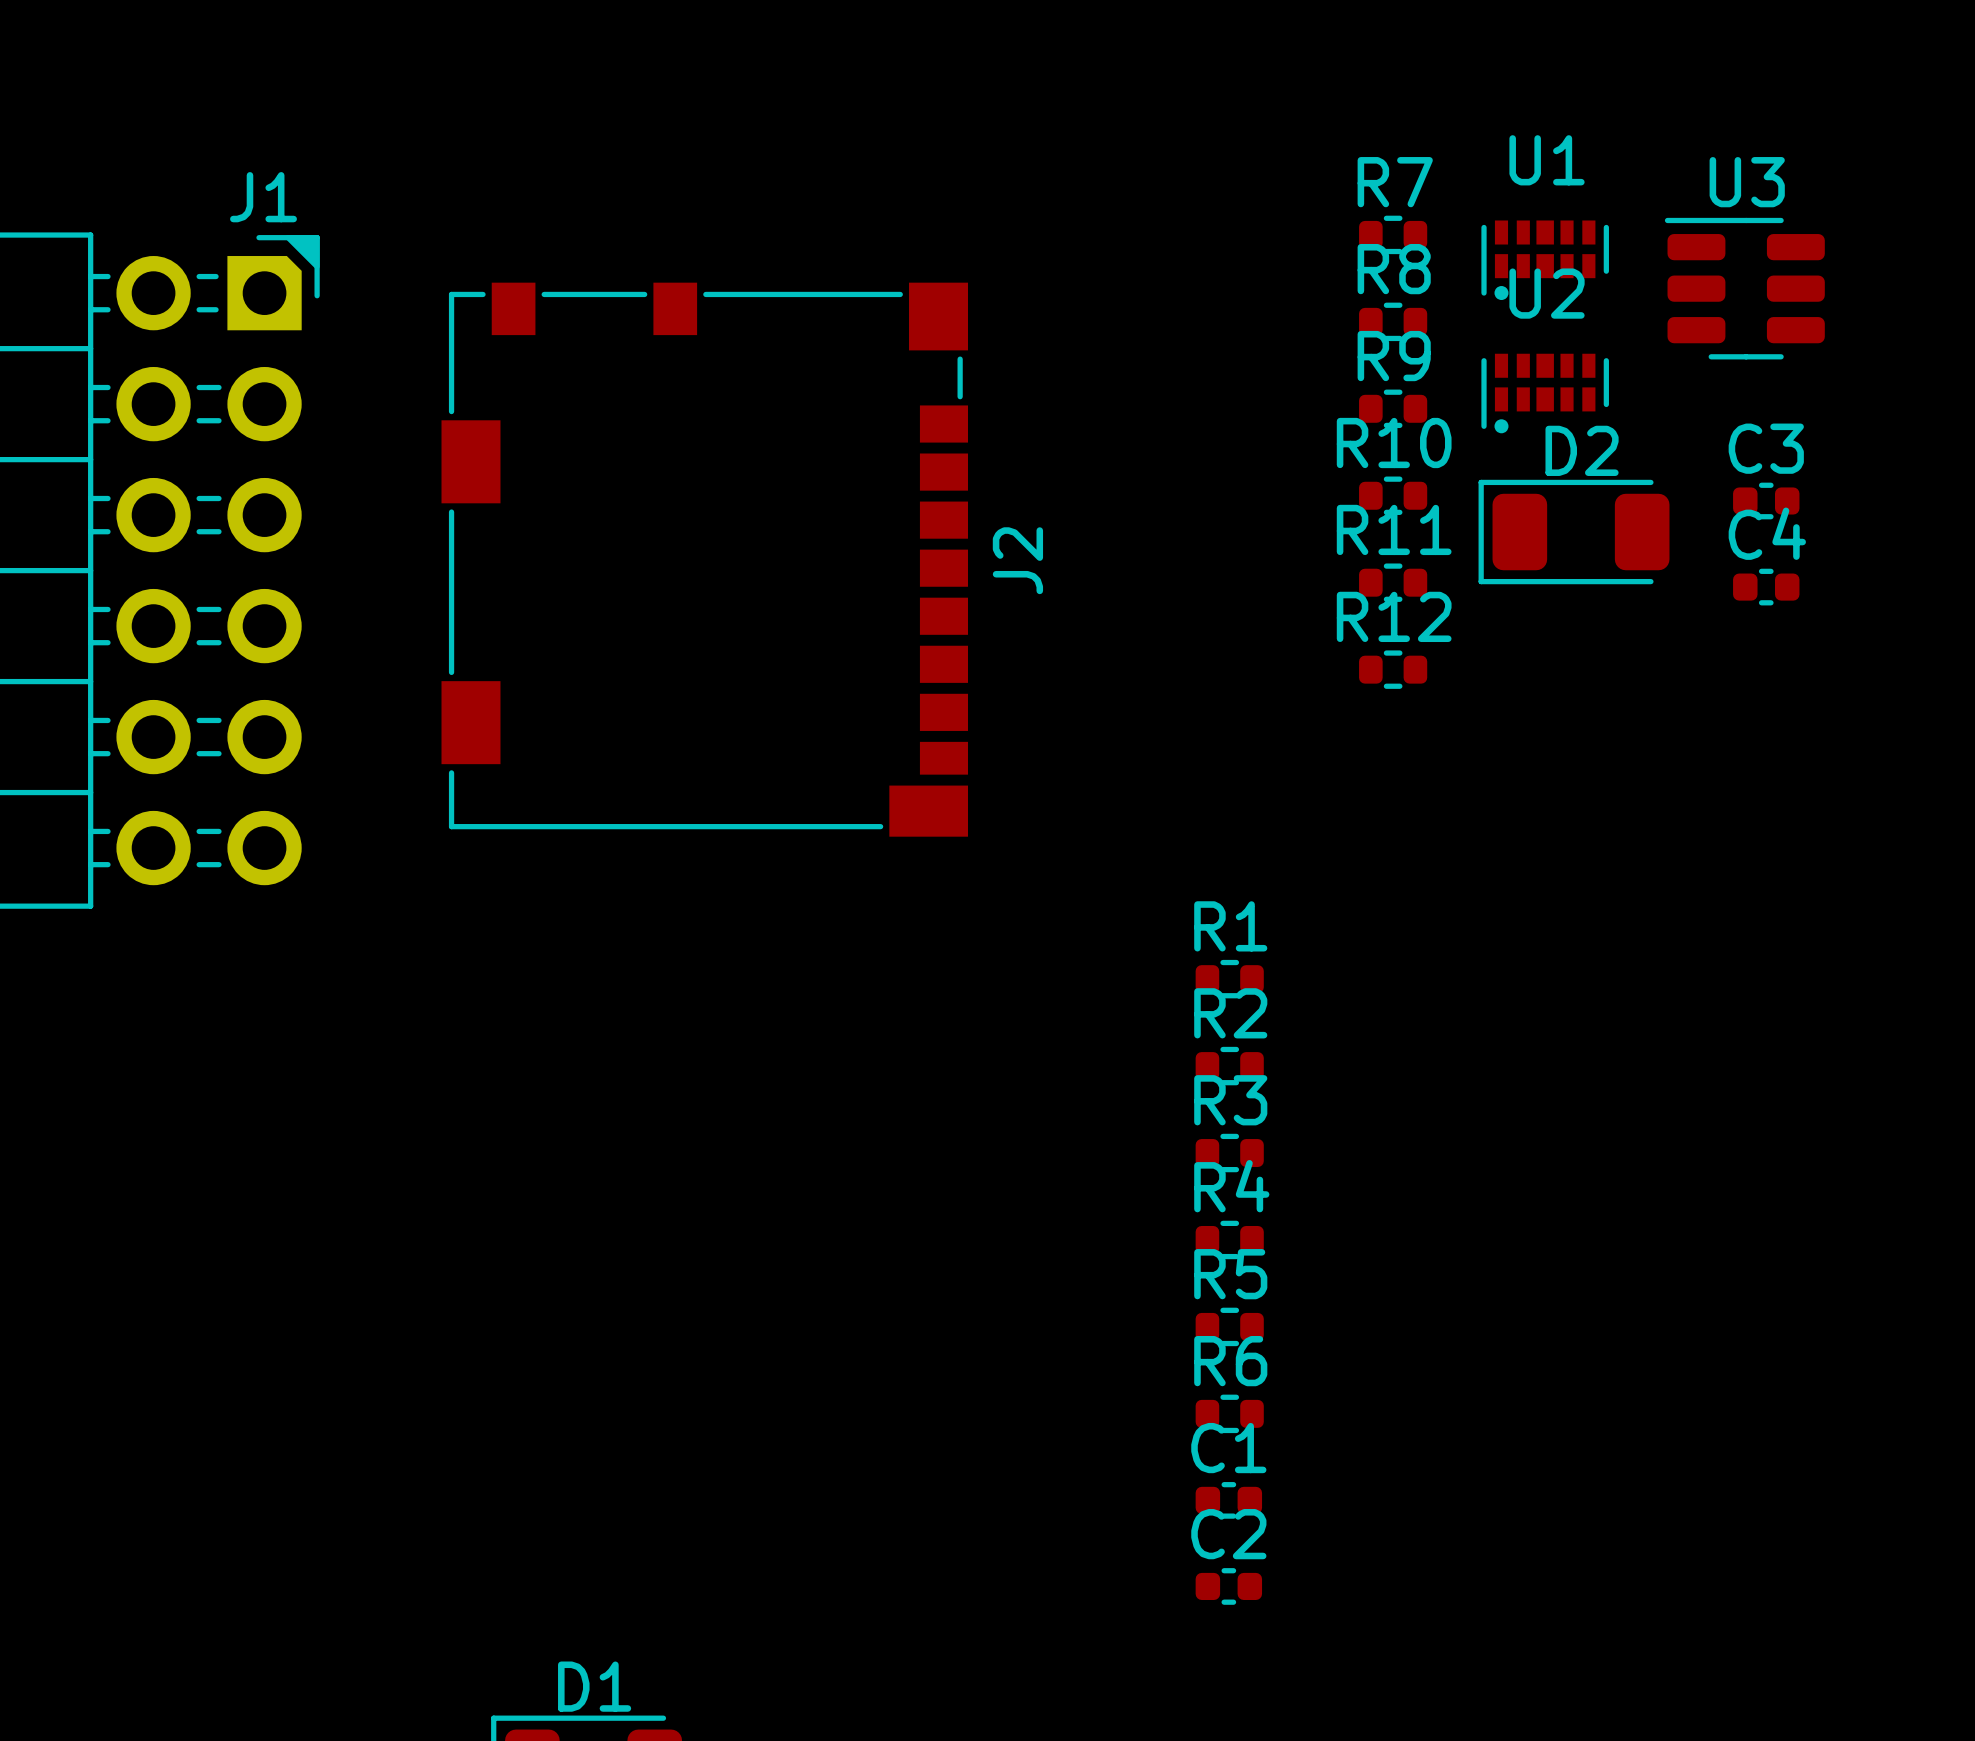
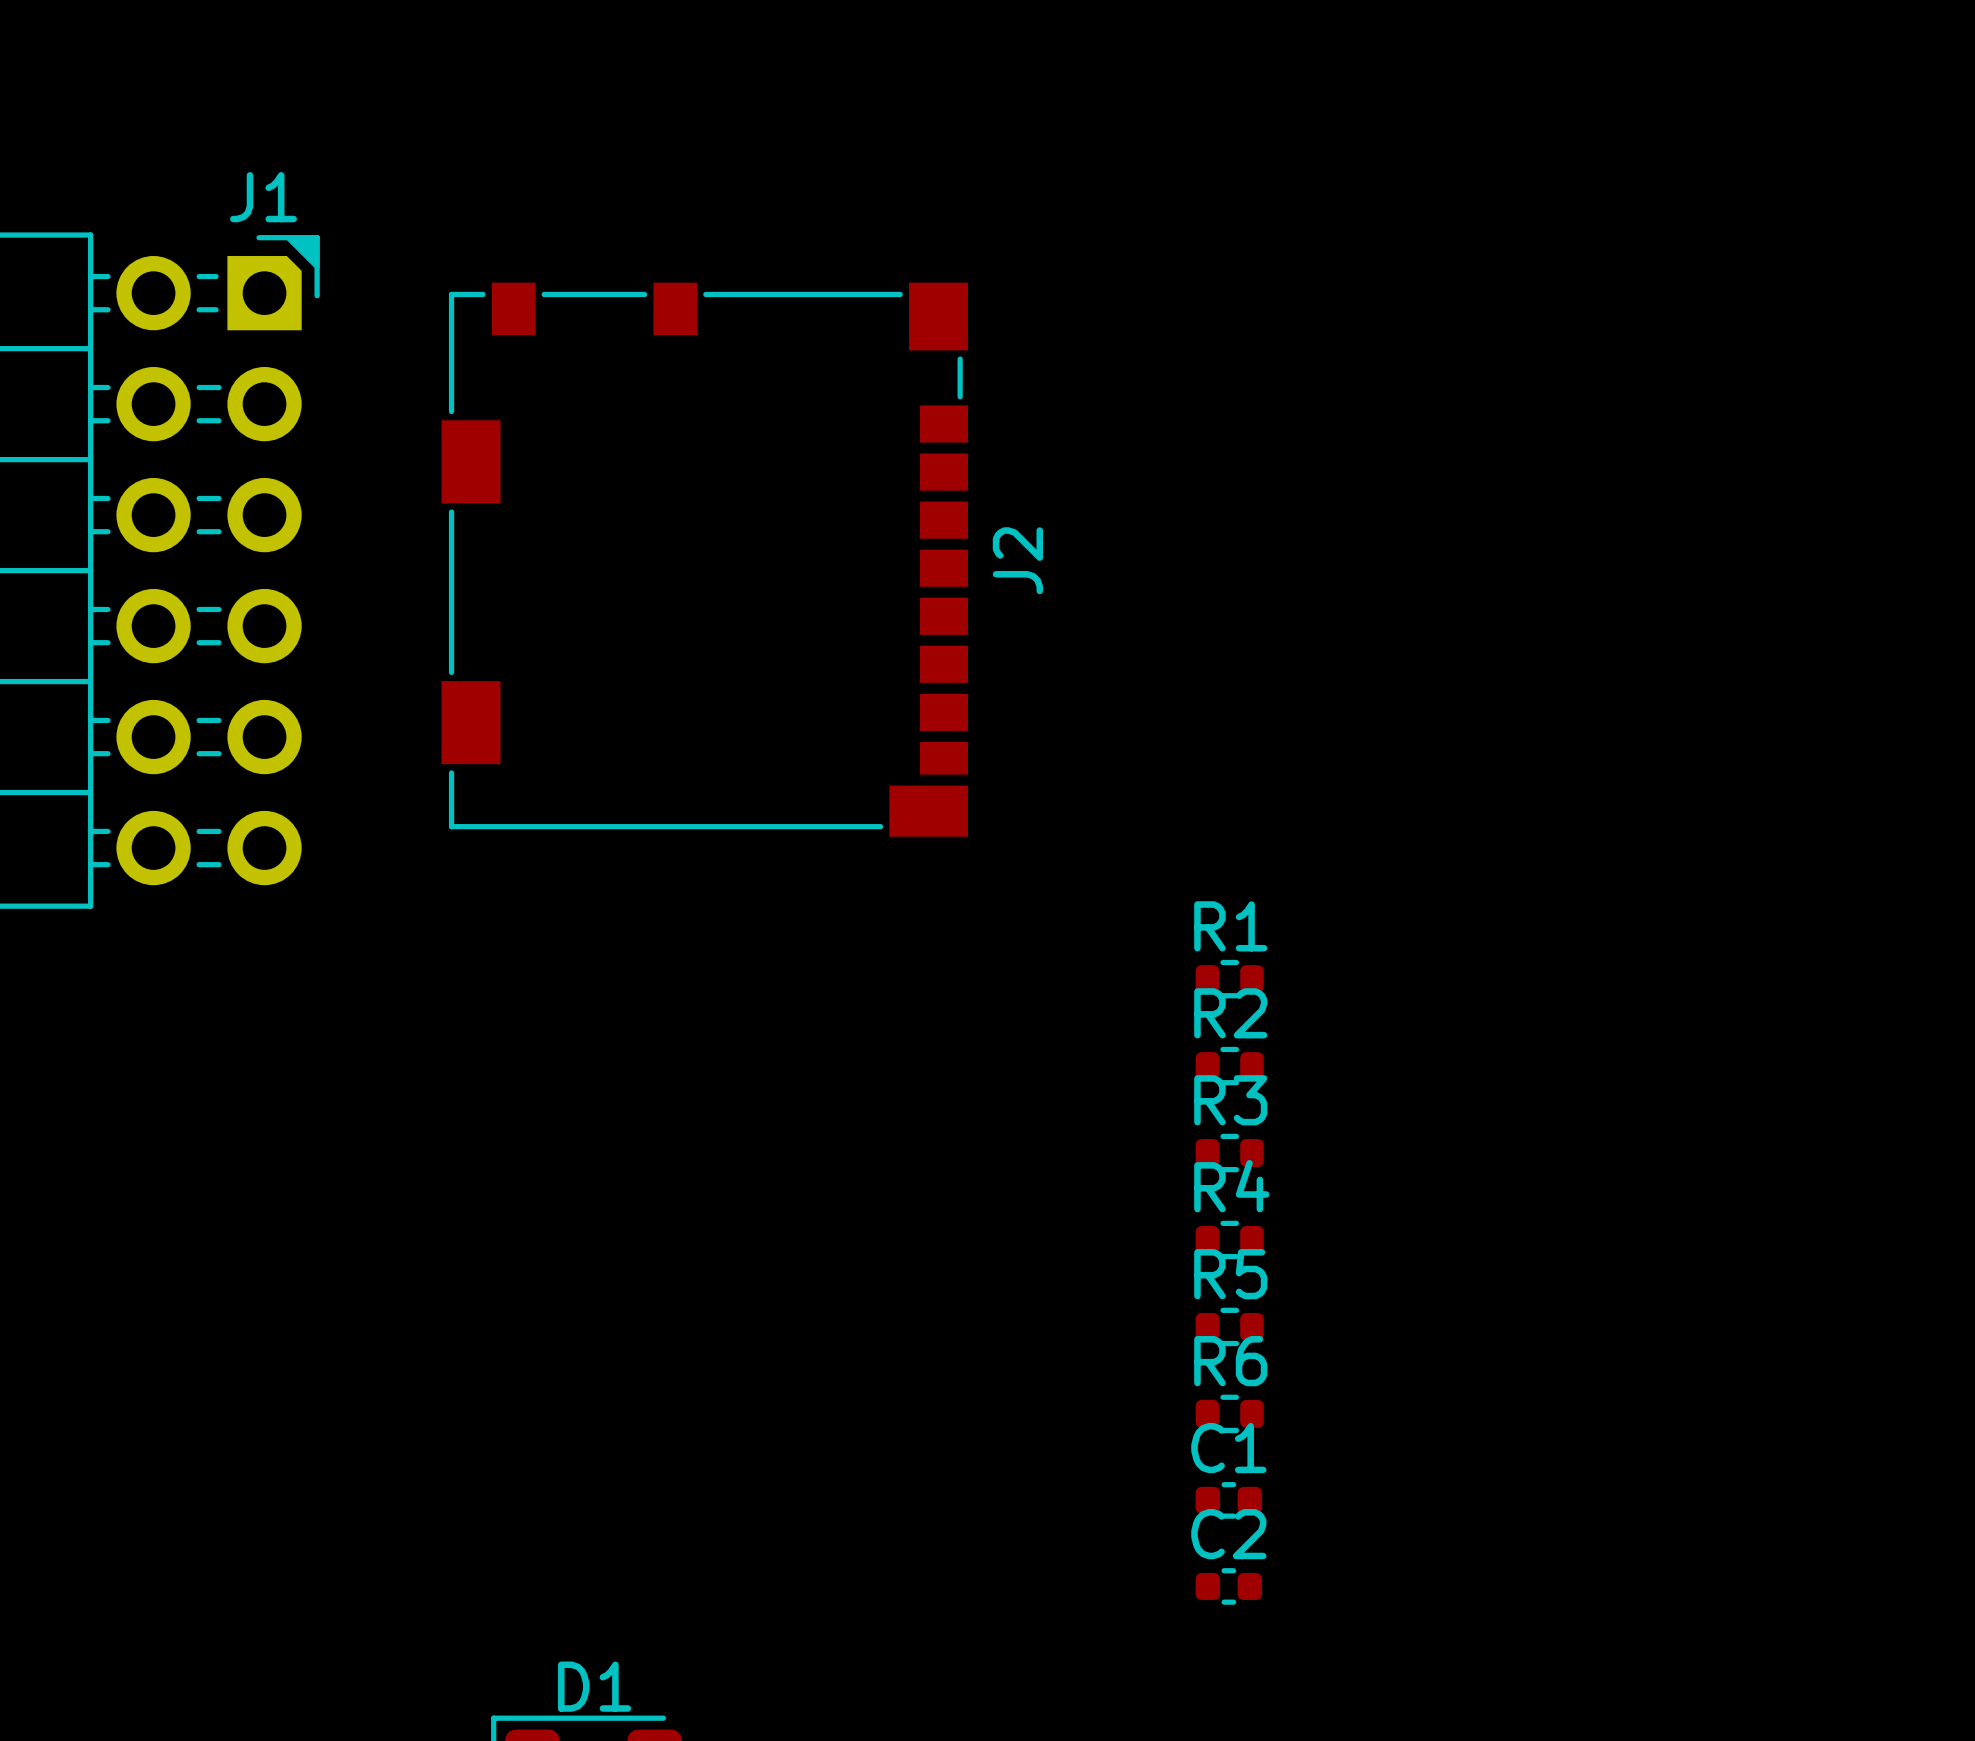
R7: (1393, 234) -> none
U1: (1545, 260) -> none
U3: (1744, 288) -> none
R8: (1393, 321) -> none
U2: (1545, 393) -> none
R9: (1393, 408) -> none
R10: (1393, 495) -> none
C3: (1766, 500) -> none
D2: (1574, 532) -> none
R11: (1393, 582) -> none
C4: (1766, 587) -> none
R12: (1393, 669) -> none

